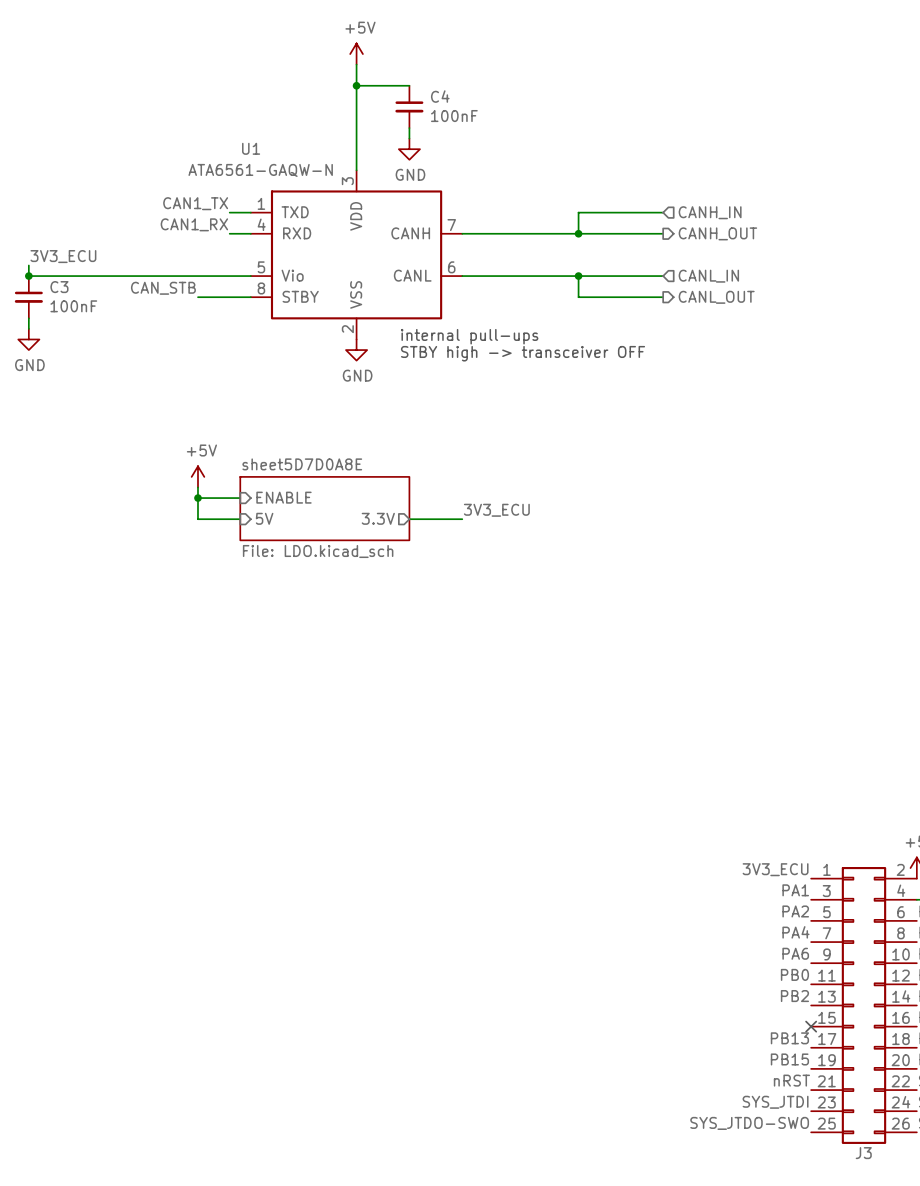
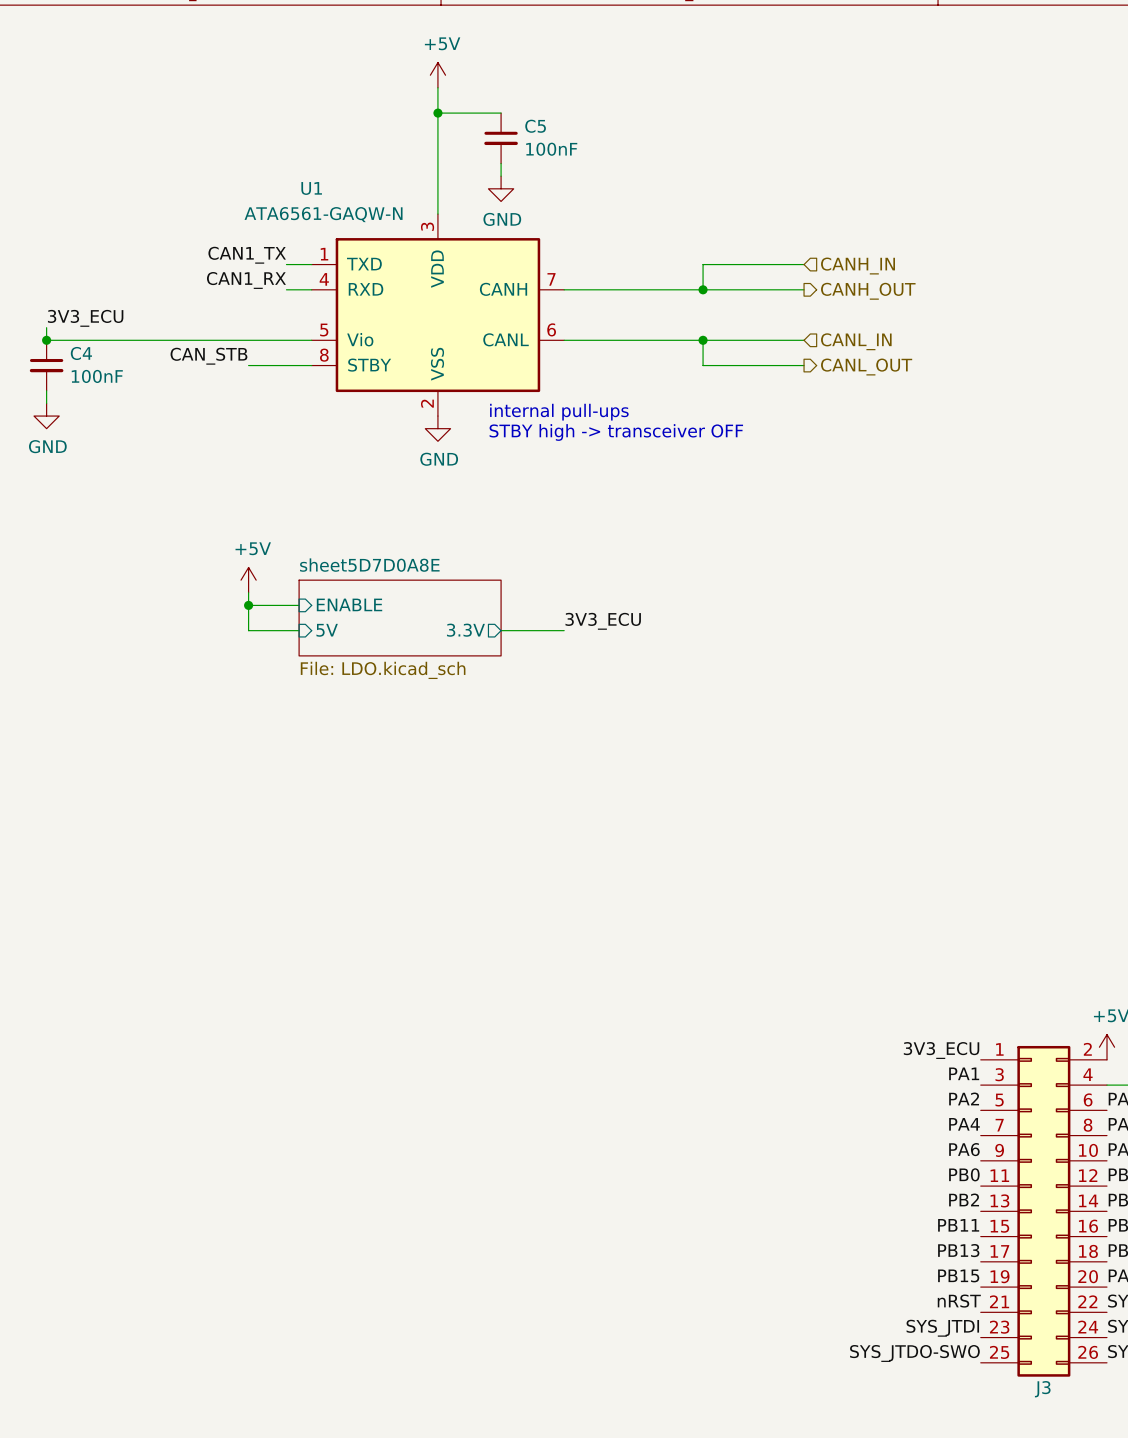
C4 name: C4 (440, 96) -> C5 (535, 126)
C3 name: C3 (59, 287) -> C4 (81, 353)
label: none -> PB11 (958, 1225)
no-connect mark: (811, 1026) -> none

